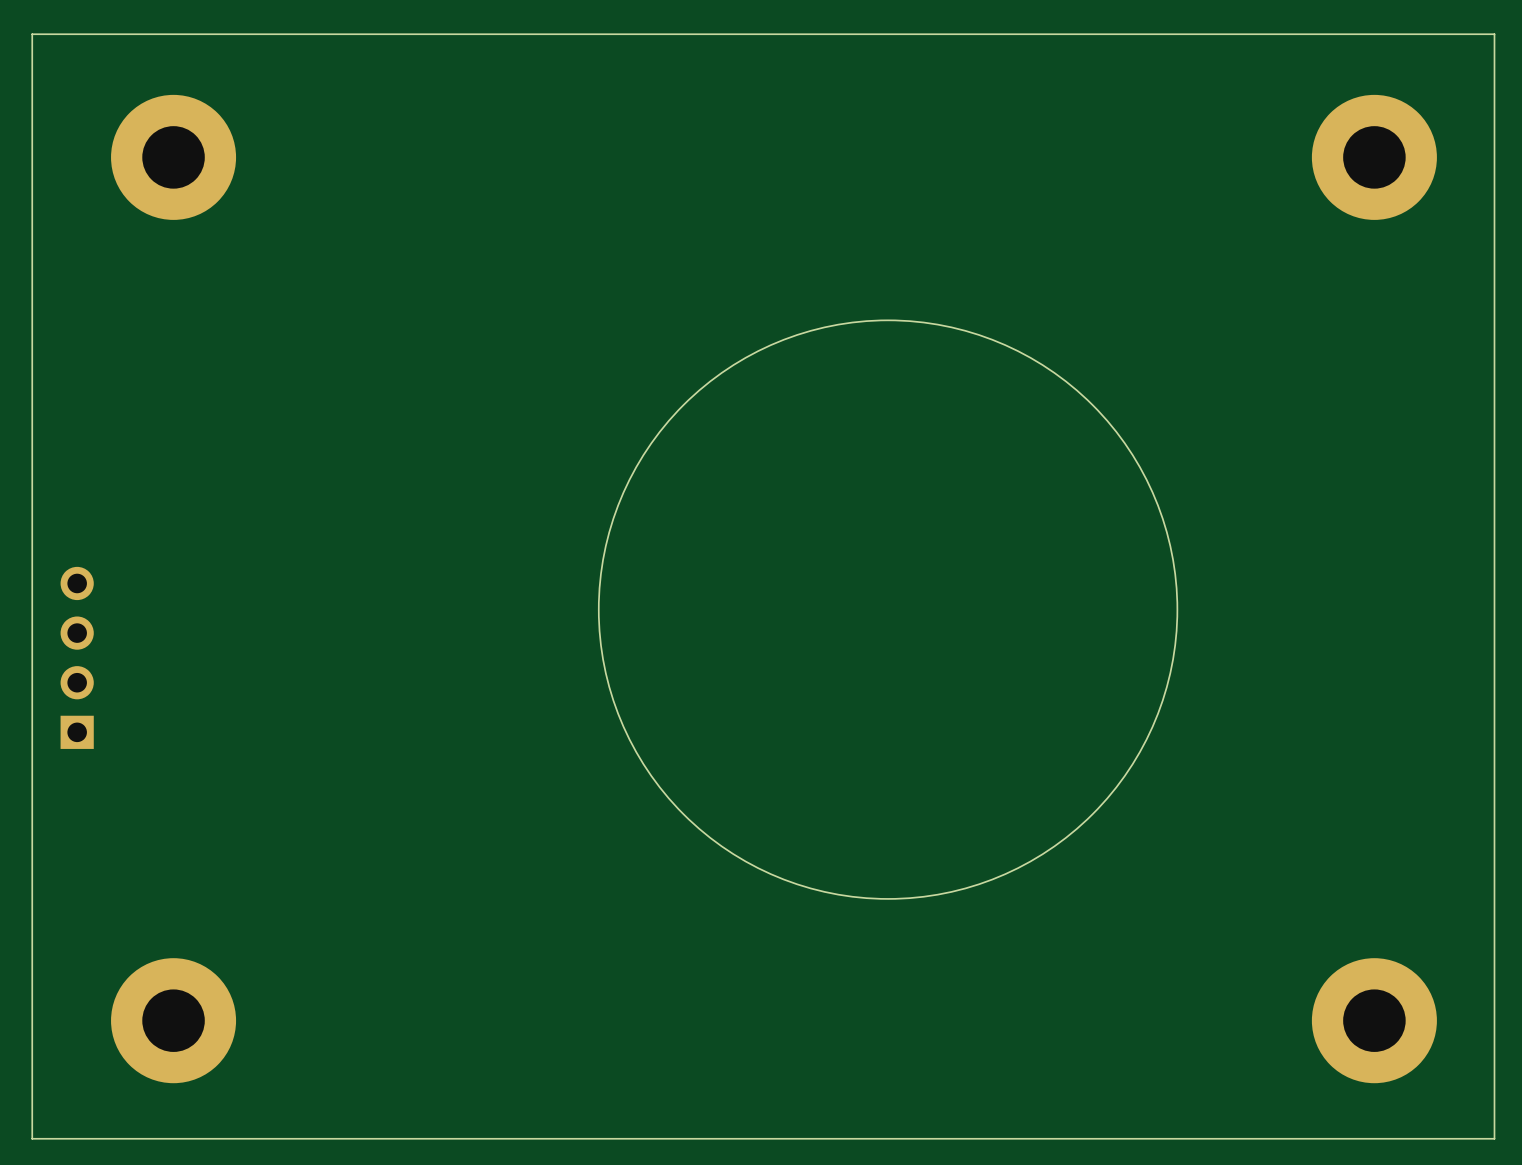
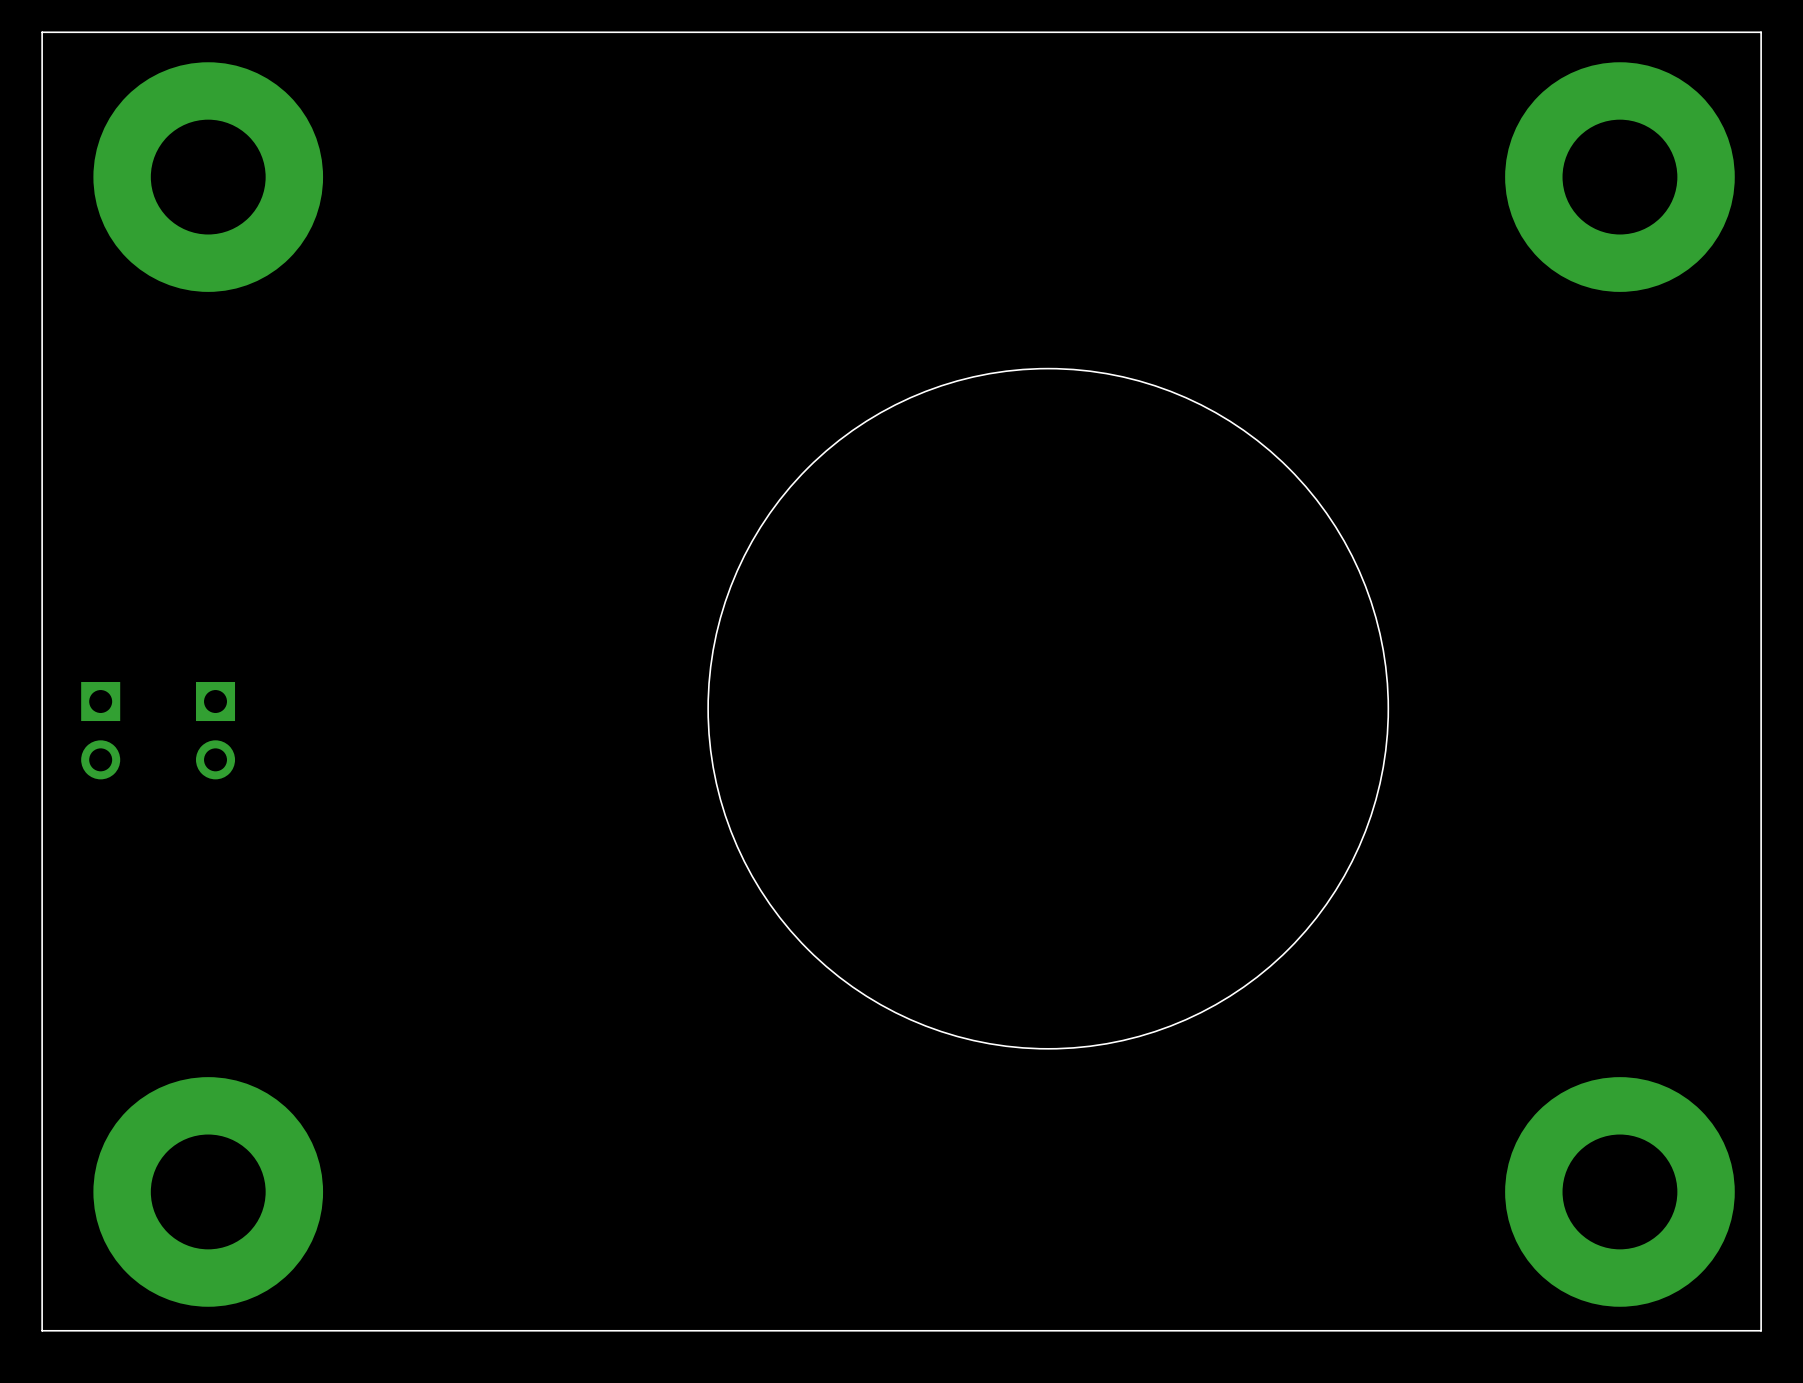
part footprint: [111, 94, 237, 220] -> [93, 62, 324, 292]
part footprint: [1311, 94, 1437, 220] -> [1505, 62, 1735, 292]
part: none -> (100, 730)
part: none -> (215, 730)
part: (77, 657) -> none
part footprint: [111, 958, 237, 1084] -> [93, 1077, 324, 1307]
part footprint: [1311, 958, 1437, 1084] -> [1505, 1077, 1735, 1307]

